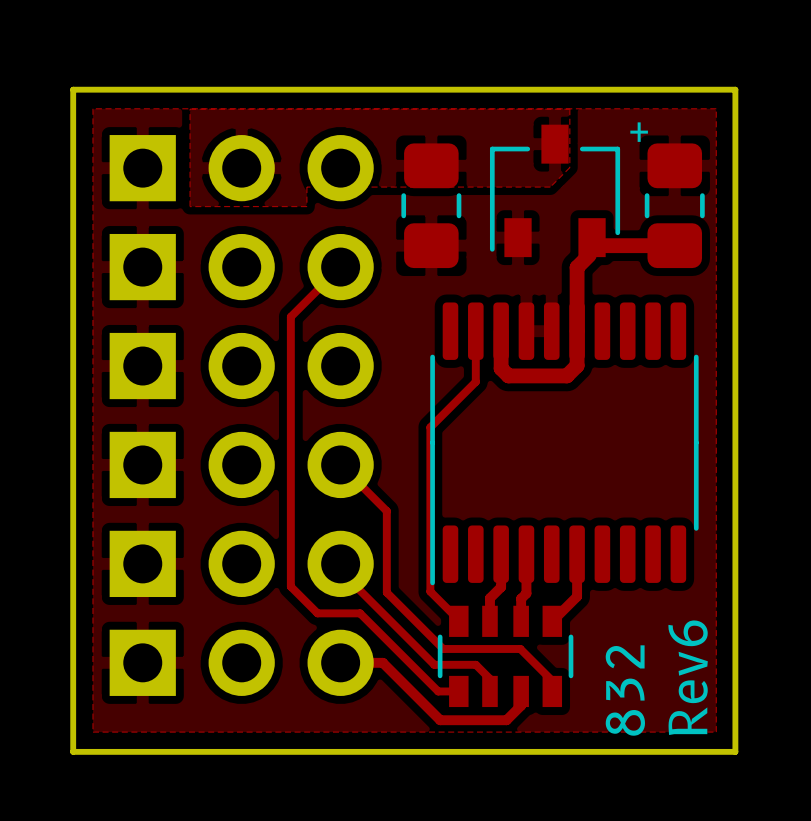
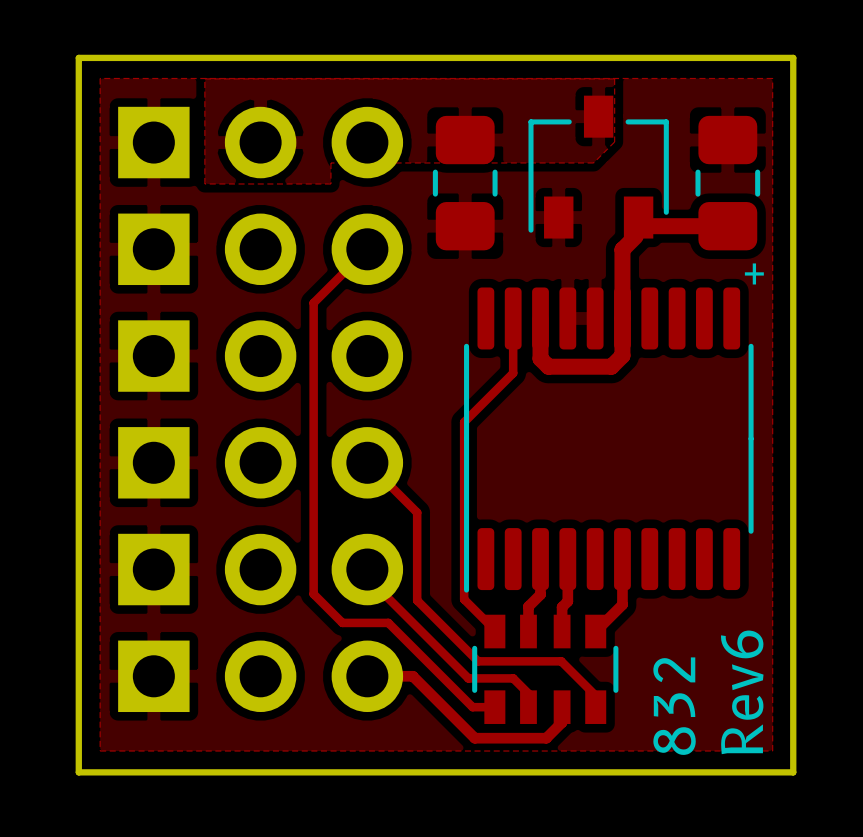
text position: + (639, 132) -> + (754, 273)

